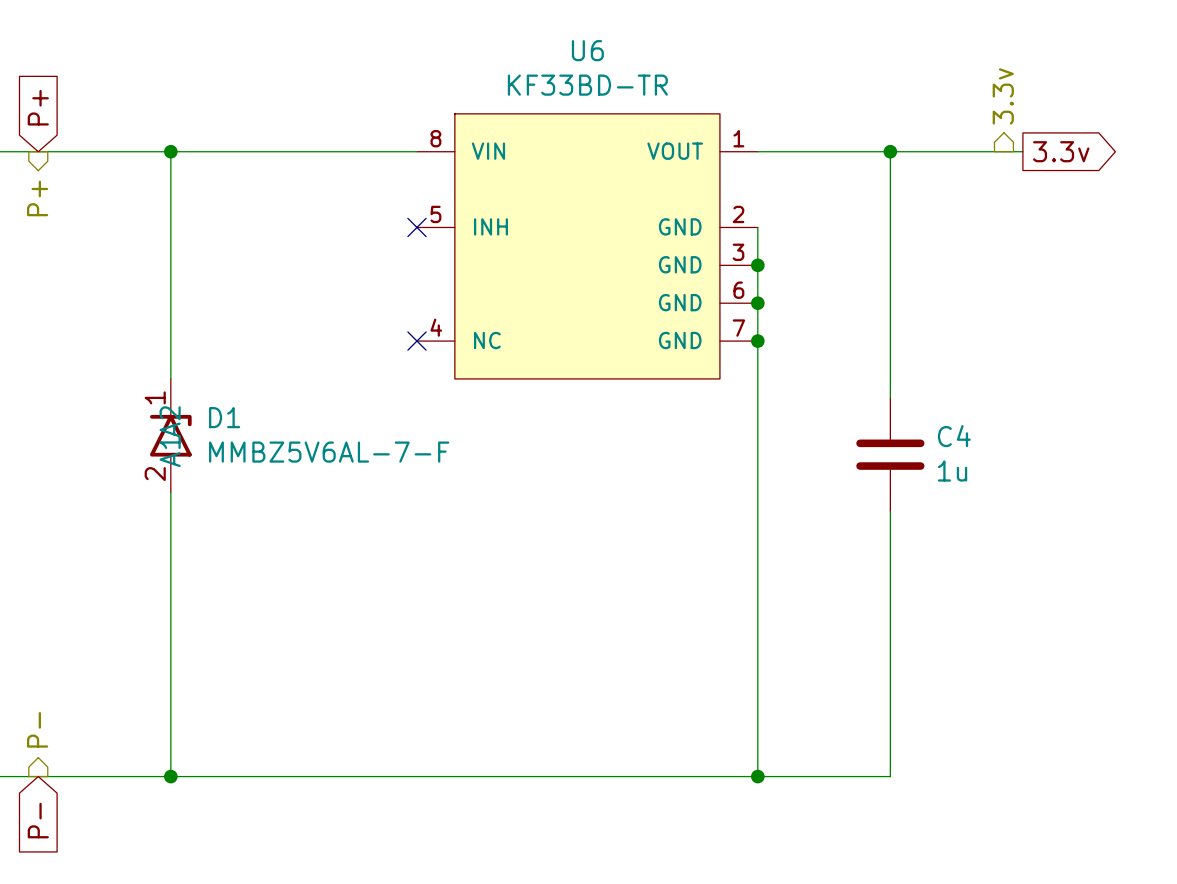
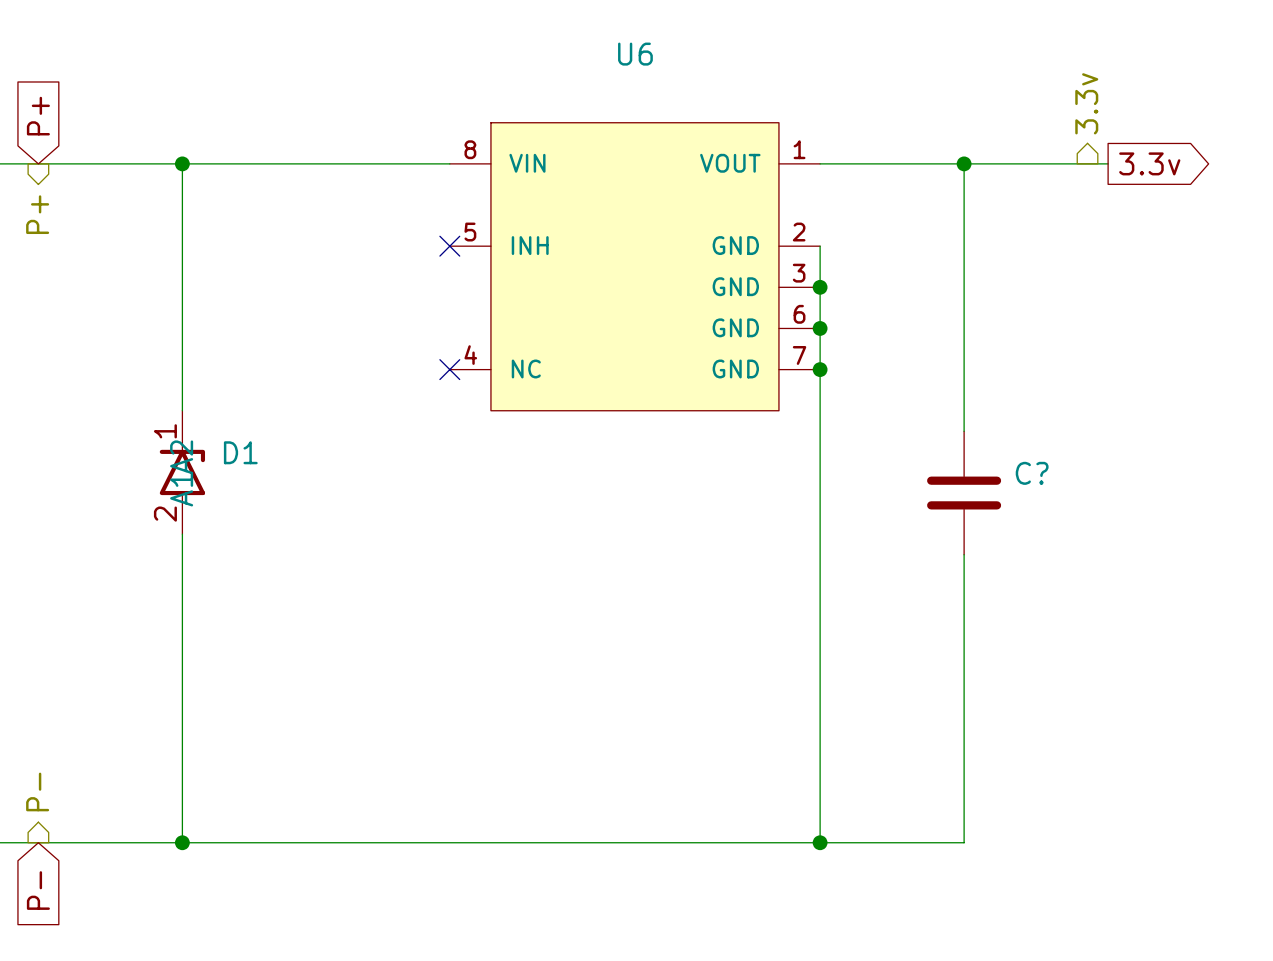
U6 value: KF33BD-TR (587, 85) -> none
C4 name: C4 (954, 436) -> C? (1032, 473)
D1 value: MMBZ5V6AL-7-F (329, 452) -> none
C4 value: 1u (952, 471) -> none

